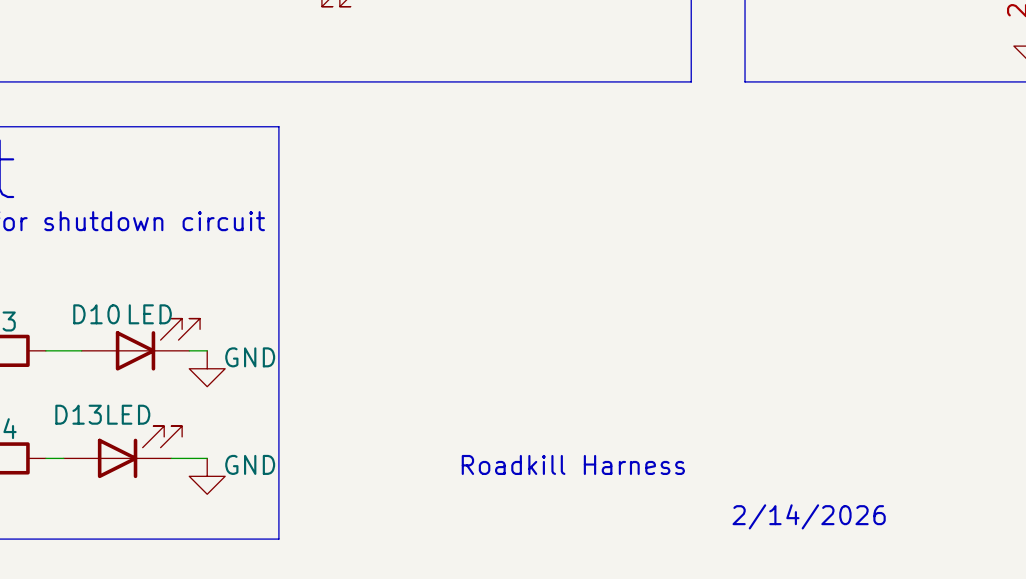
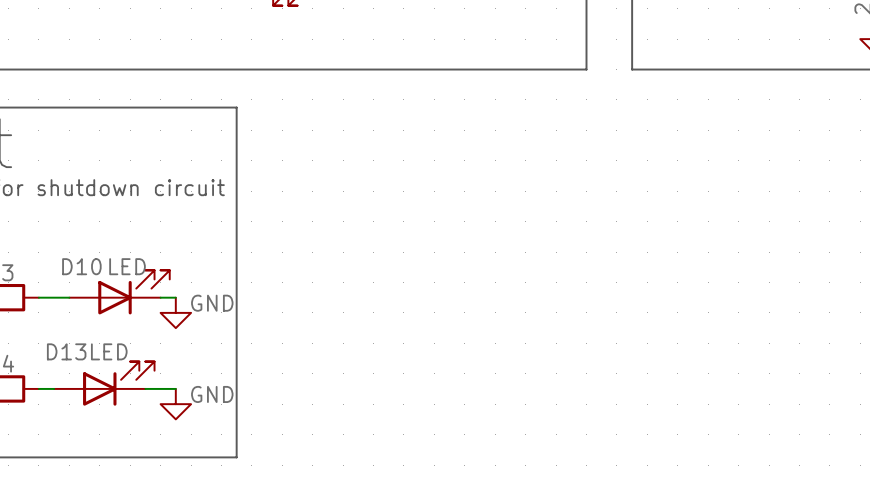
text: Roadkill Harness (573, 464) -> none
text: 2/14/2026 (809, 516) -> none

